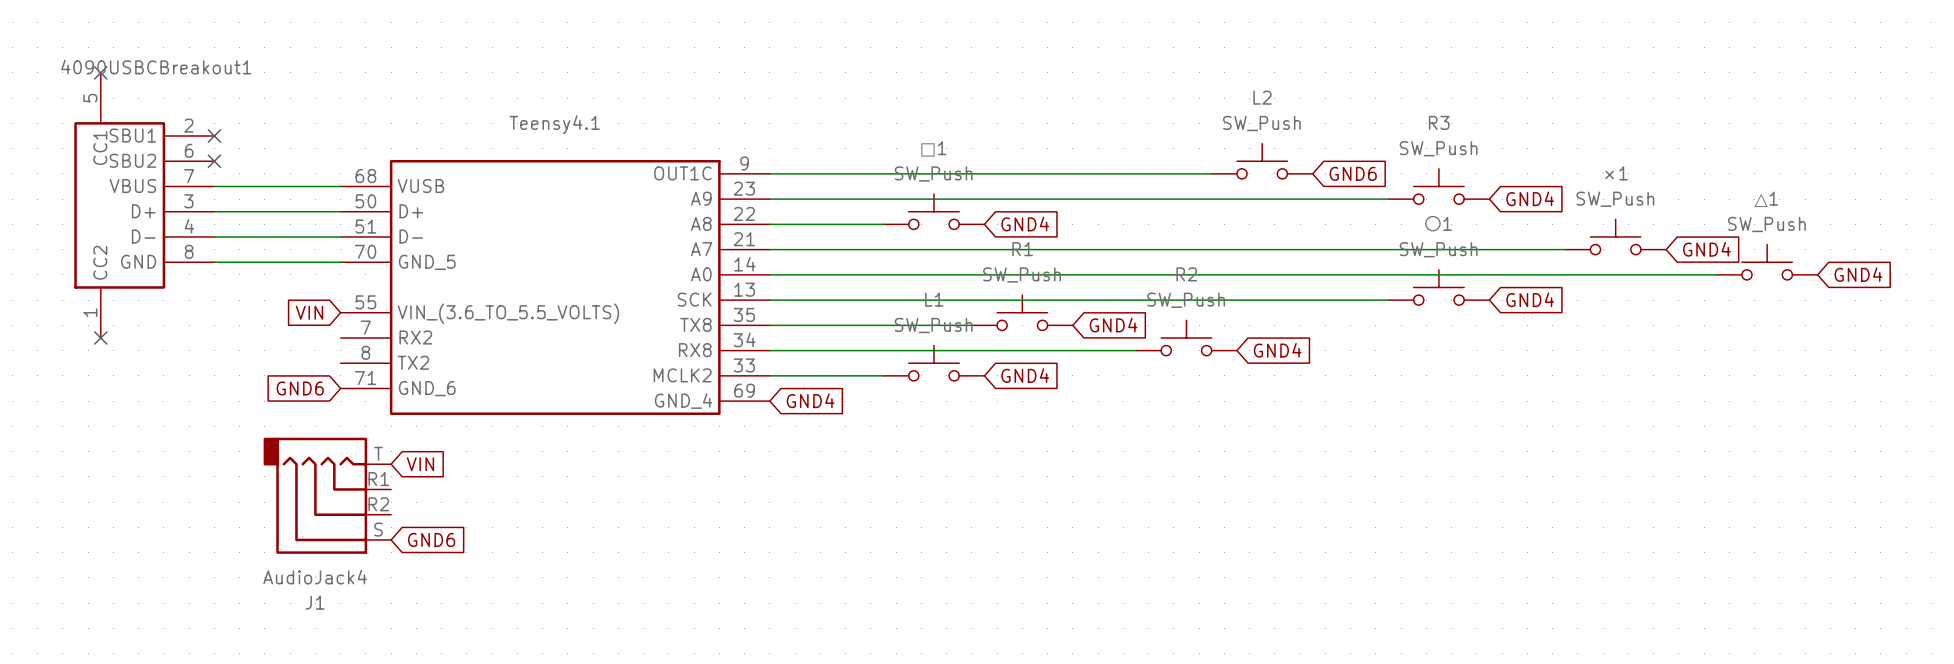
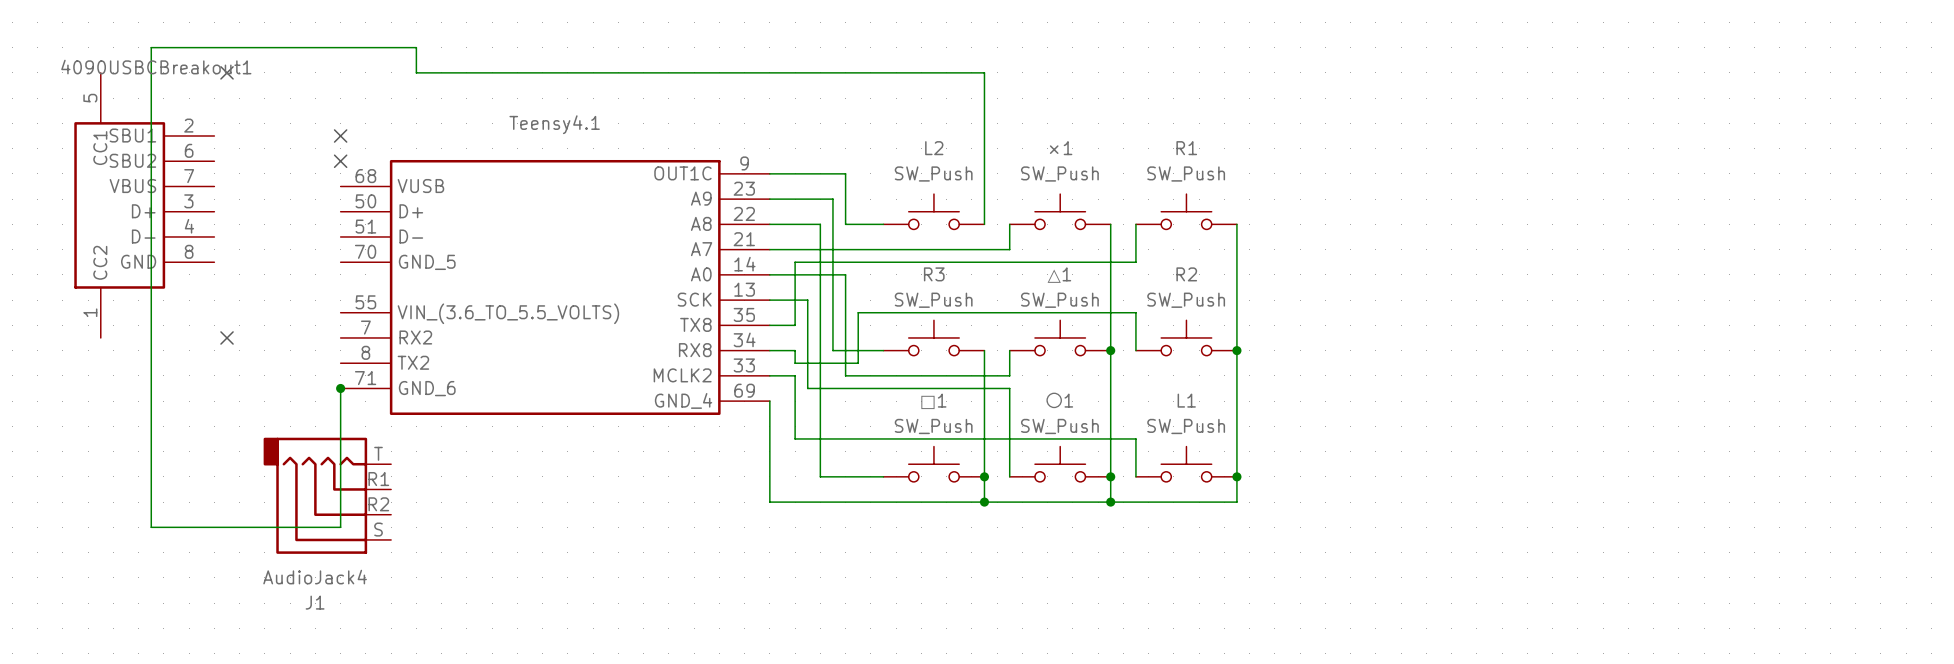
no-connect mark: (100, 72) -> none
no-connect mark: none -> (227, 72)
no-connect mark: (214, 136) -> none
no-connect mark: none -> (340, 136)
□1 name: □1 (933, 149) -> L2 (934, 148)
no-connect mark: (214, 161) -> none
no-connect mark: none -> (340, 161)
L2: SW_Push (1262, 161) -> none
wire: (845, 173) (1211, 173) -> none
global label: GND6 (1353, 173) -> none
wire: (214, 186) (340, 186) -> none
R3 position: (1438, 186) -> (933, 337)
global label: GND4 (1530, 198) -> none
wire: (832, 199) (1388, 199) -> none
wire: (214, 211) (340, 211) -> none
wire: (820, 224) (845, 224) -> (845, 173) (845, 224)
wire: none -> (820, 224) (820, 476) (883, 476)
wire: none -> (984, 224) (984, 72) (416, 72) (416, 47) (151, 47) (151, 527) (340, 527) (340, 388)
global label: GND4 (1025, 224) -> none
wire: none -> (1110, 224) (1110, 502)
wire: none -> (1236, 224) (1236, 502) (769, 502) (769, 401)
wire: (214, 236) (340, 236) -> none
×1 position: (1615, 236) -> (1060, 211)
wire: (1009, 249) (1565, 249) -> (1009, 249) (1009, 224)
global label: GND4 (1706, 249) -> none
wire: (214, 262) (340, 262) -> none
△1 position: (1767, 262) -> (1060, 337)
wire: (845, 274) (1716, 274) -> none
global label: GND4 (1858, 274) -> none
〇1 position: (1438, 287) -> (1060, 464)
global label: GND4 (1530, 299) -> none
wire: (807, 300) (1388, 300) -> (807, 300) (807, 388) (1009, 388) (1009, 476)
global label: VIN (309, 312) -> none
R1 position: (1022, 312) -> (1186, 211)
wire: (795, 325) (971, 325) -> (795, 325) (795, 262) (1135, 262) (1135, 224)
global label: GND4 (1113, 325) -> none
no-connect mark: (100, 337) -> none
no-connect mark: none -> (227, 337)
wire: (795, 350) (832, 350) -> (832, 199) (832, 350)
wire: (883, 350) (1135, 350) -> (795, 350) (795, 363) (858, 363) (858, 312) (1135, 312) (1135, 350)
wire: none -> (984, 350) (984, 502)
wire: none -> (1009, 350) (1009, 375) (883, 375)
junction: none -> (1110, 350)
junction: none -> (1236, 350)
global label: GND4 (1277, 350) -> none
L1 position: (933, 363) -> (1186, 464)
wire: (795, 375) (845, 375) -> (845, 274) (845, 375)
wire: none -> (795, 375) (795, 438) (1135, 438) (1135, 476)
global label: GND4 (1025, 375) -> none
global label: GND6 (300, 388) -> none
junction: none -> (340, 388)
global label: GND4 (810, 400) -> none
global label: VIN (420, 464) -> none
□1: none -> SW_Push (933, 464)
junction: none -> (984, 476)
junction: none -> (1110, 476)
junction: none -> (1236, 476)
junction: none -> (984, 502)
junction: none -> (1110, 502)
global label: GND6 (431, 539) -> none

